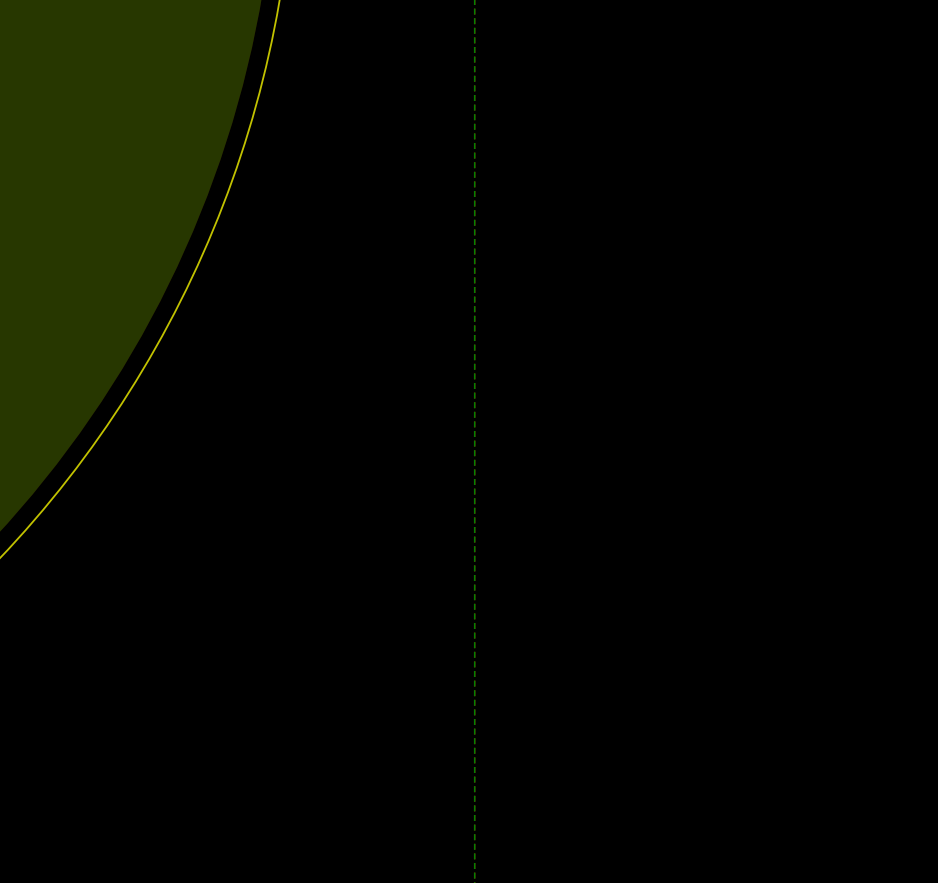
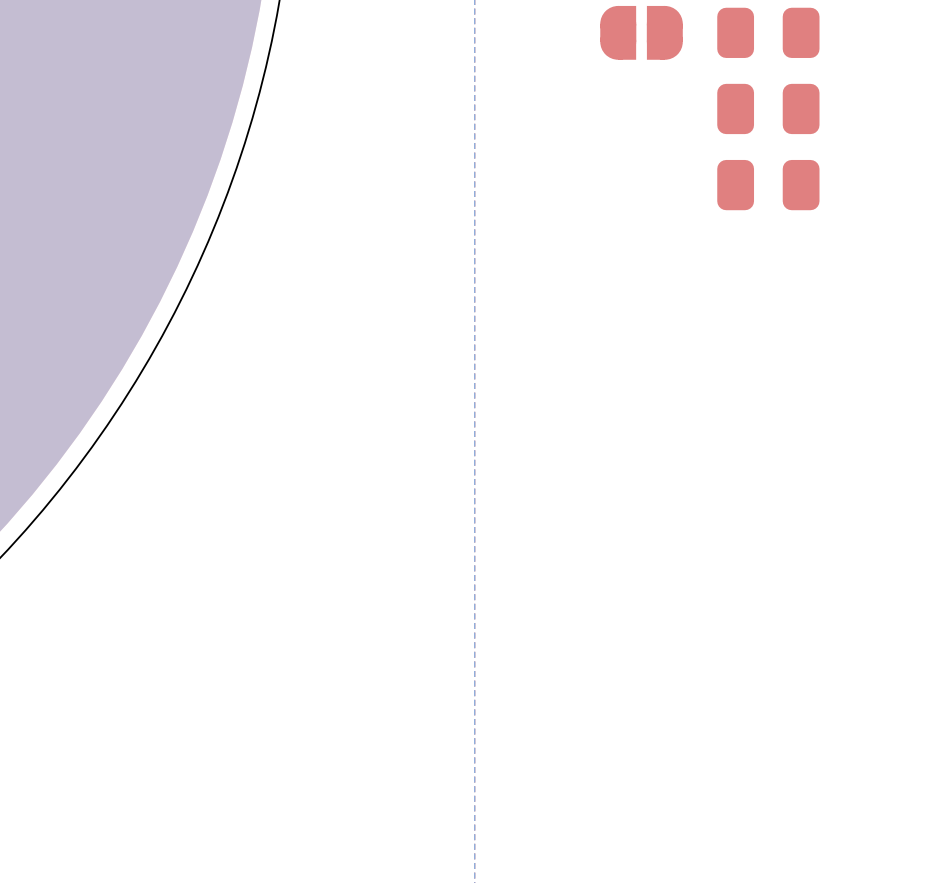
part: none -> (641, 32)
part: none -> (768, 32)
part: none -> (768, 108)
part: none -> (768, 185)

